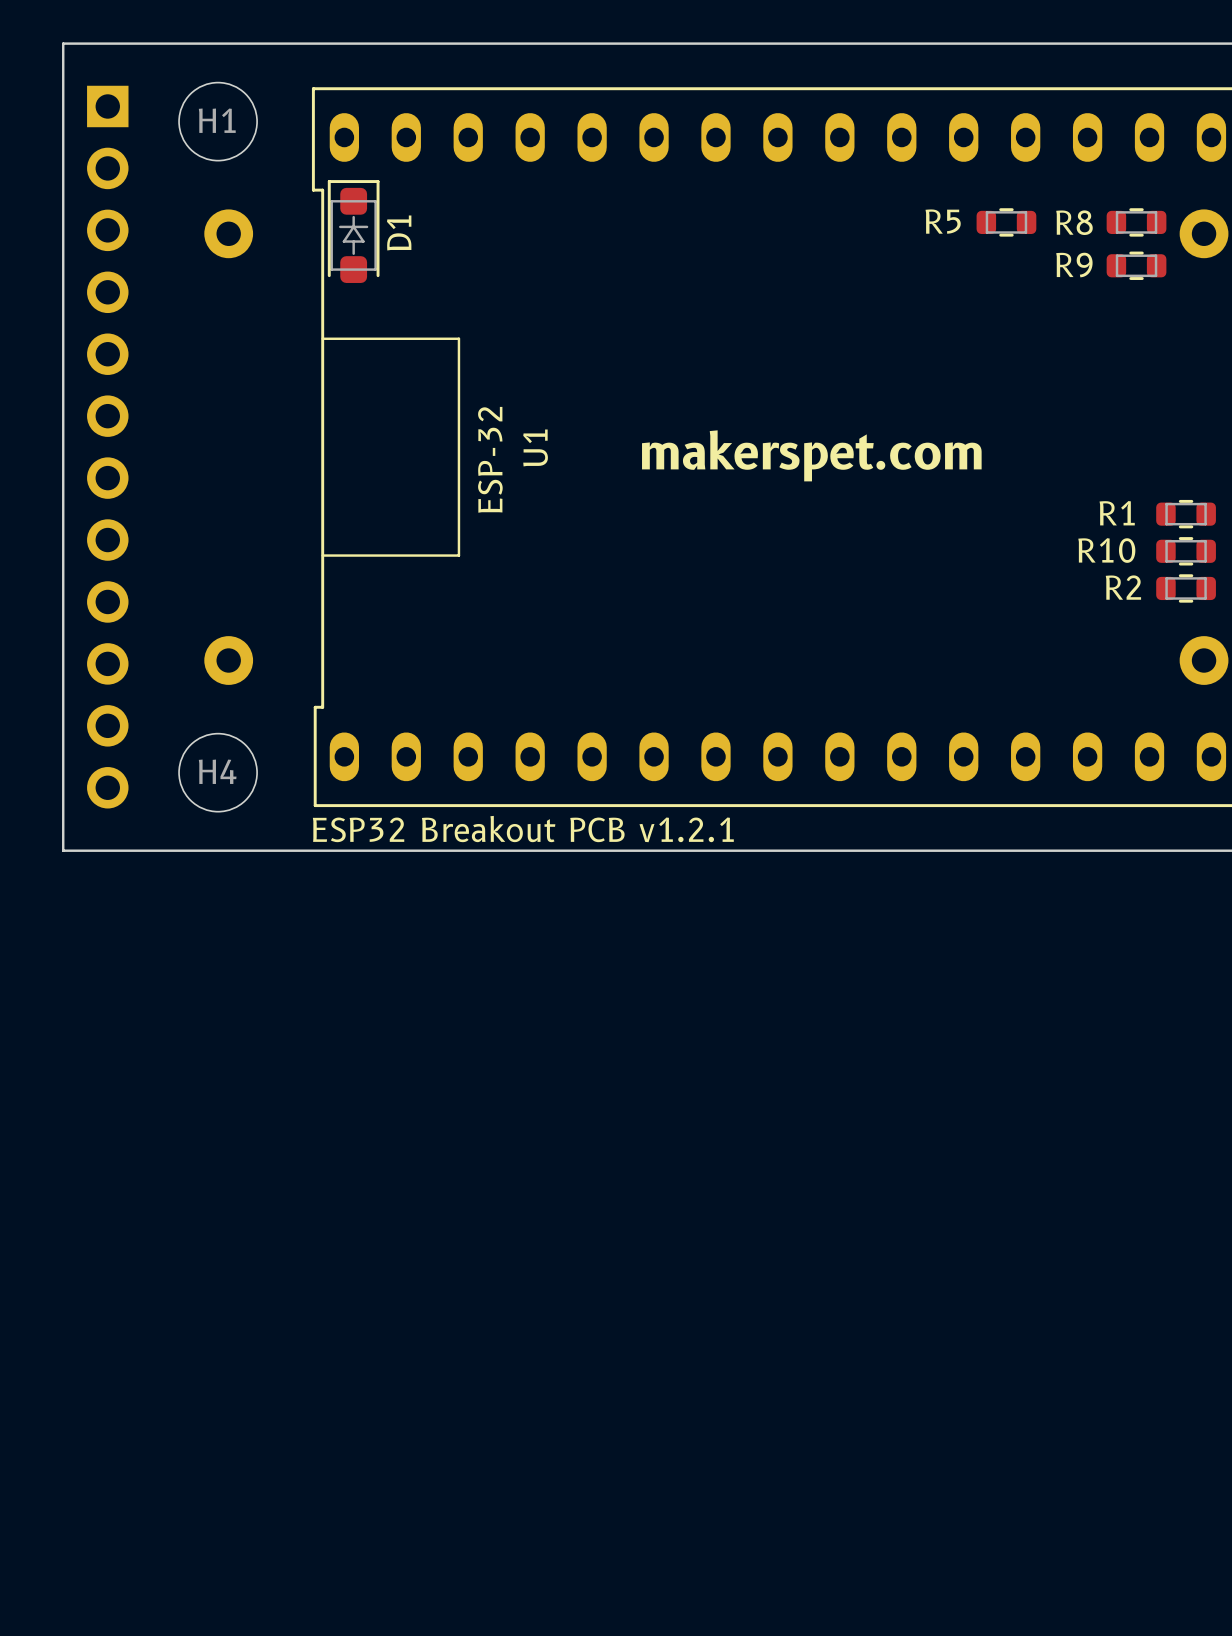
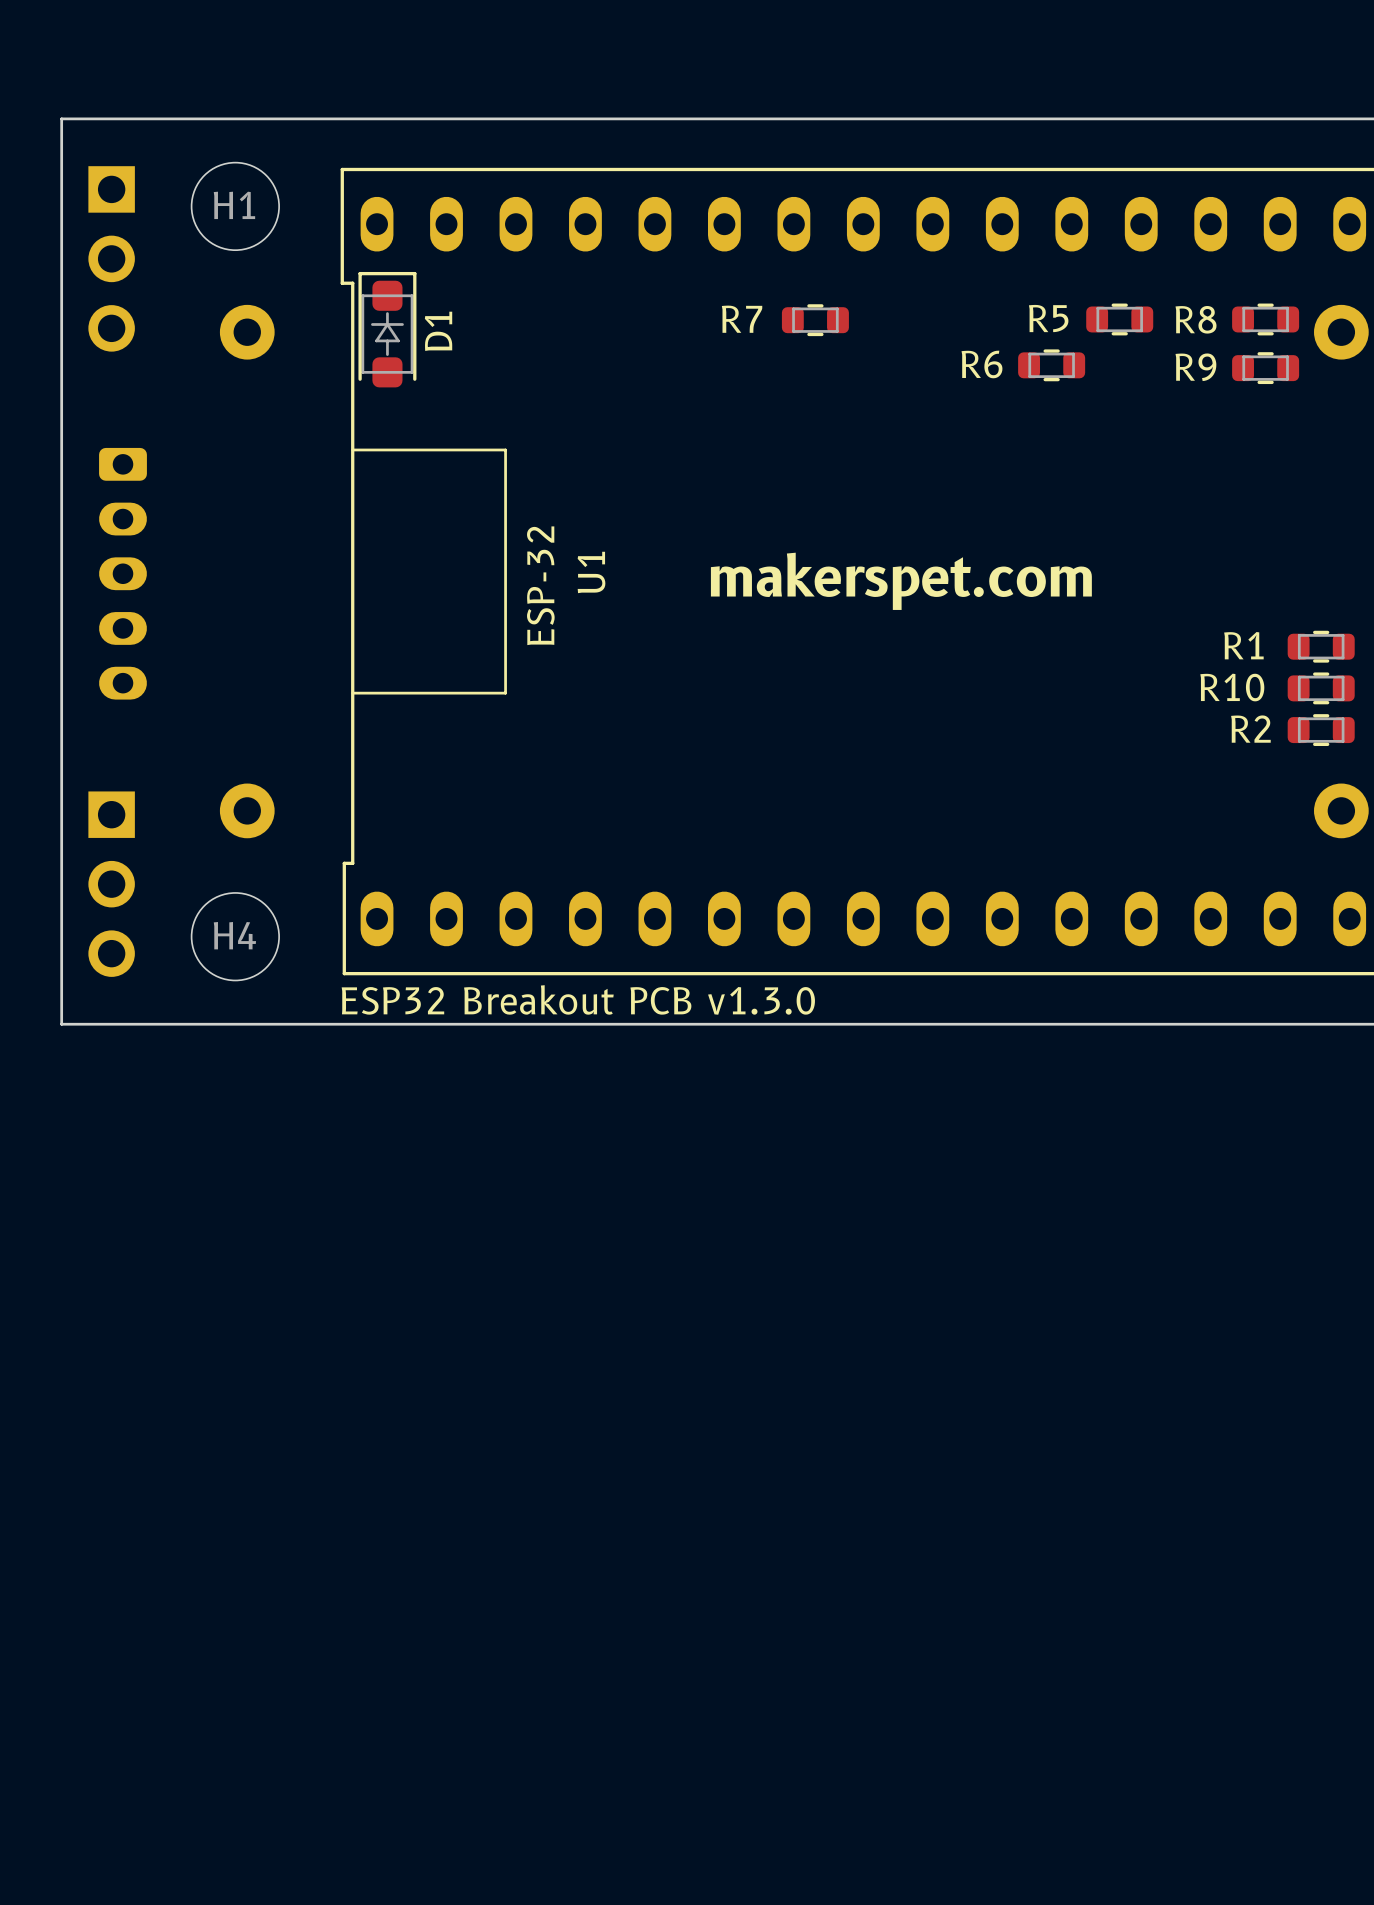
part footprint: [87, 85, 129, 809] -> [99, 447, 147, 700]
R7: none -> (815, 320)
R6: none -> (1051, 365)
part: none -> (111, 884)
text: ESP32 Breakout PCB v1.2.1 (523, 829) -> ESP32 Breakout PCB v1.3.0 (578, 999)

